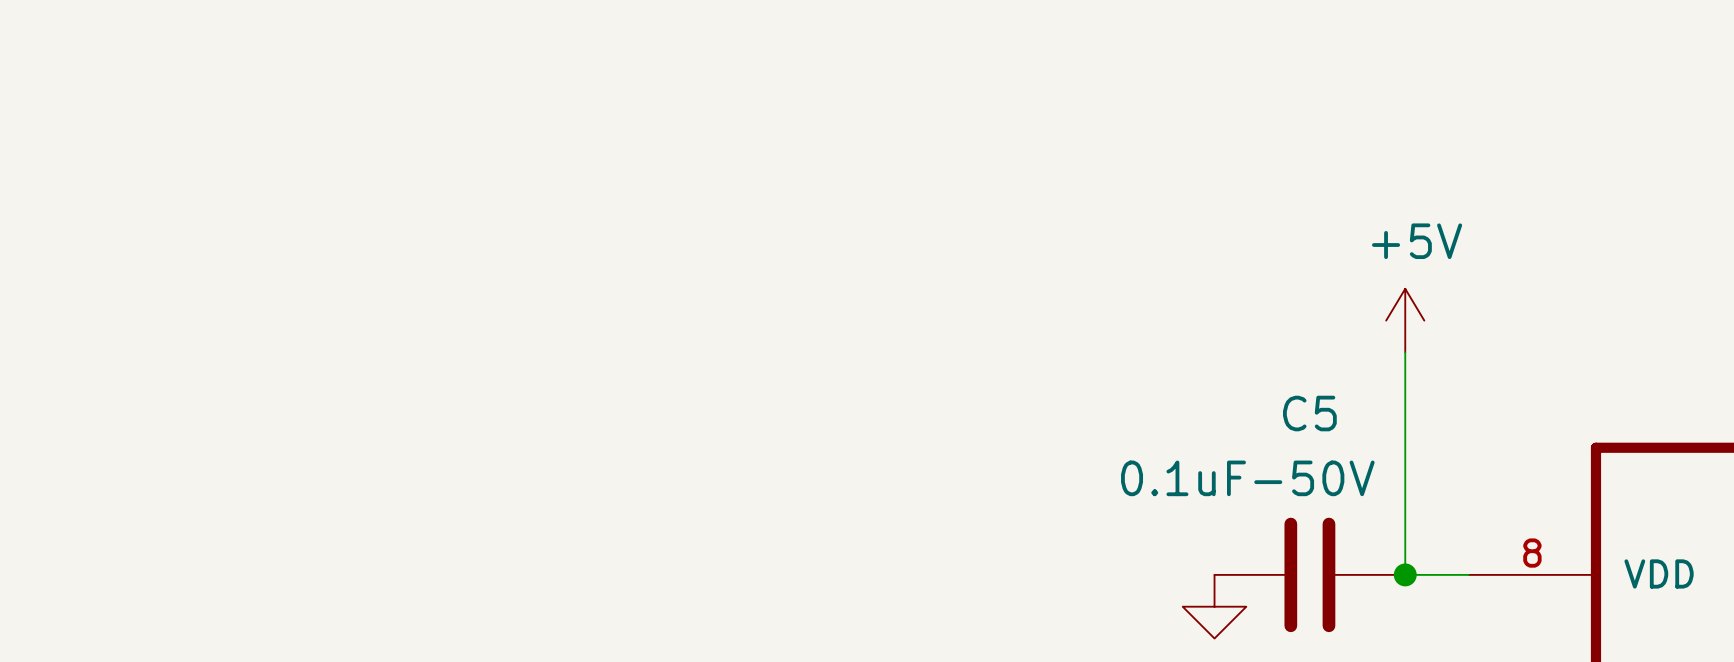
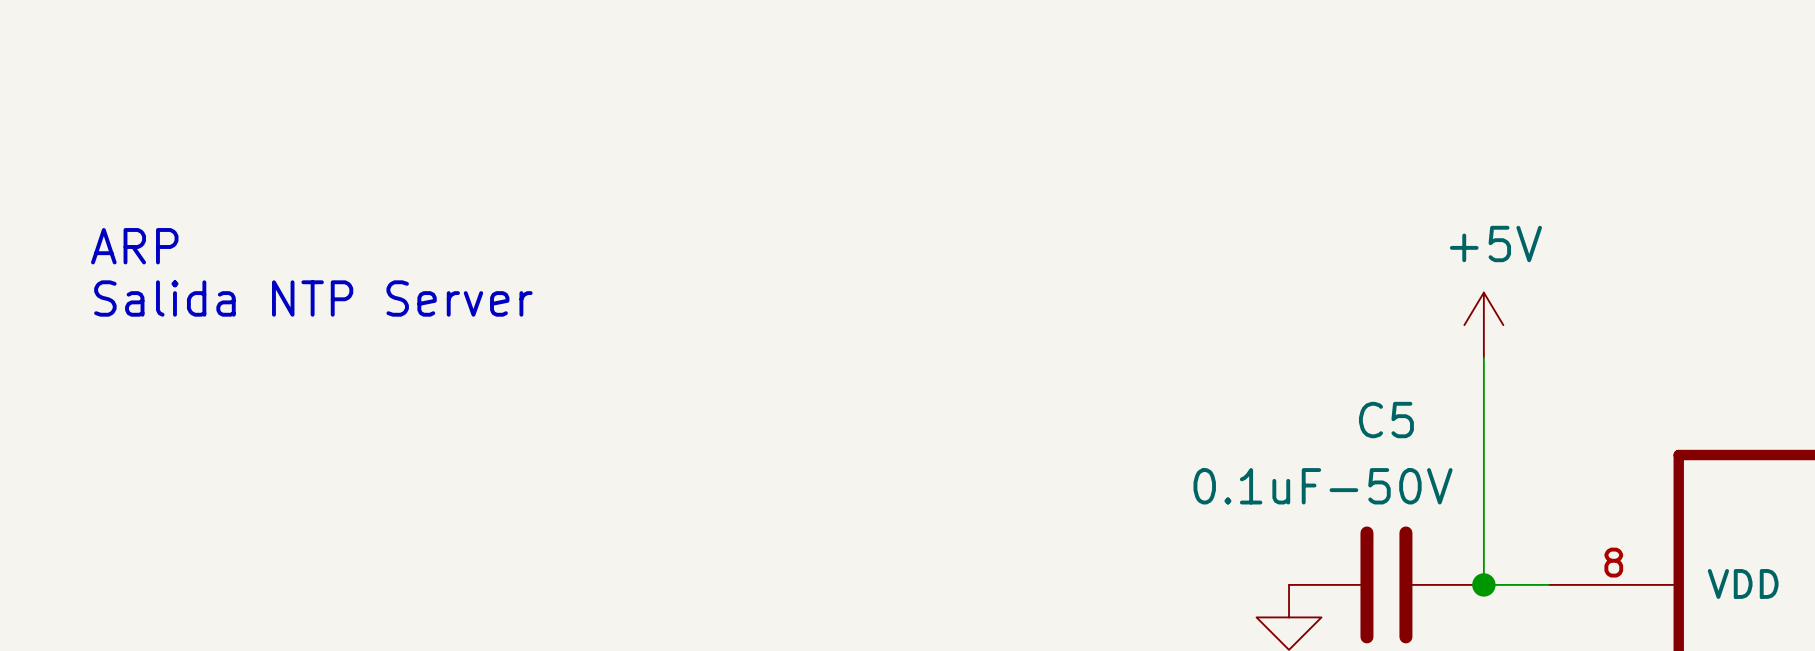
text: none -> ARP (134, 246)
text: none -> Salida NTP Server (313, 298)

